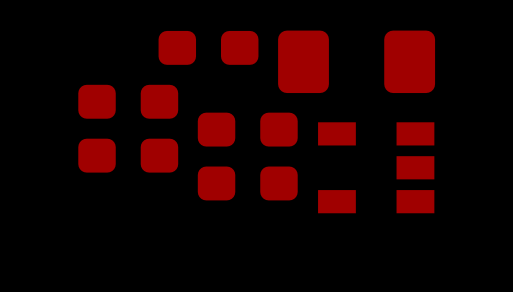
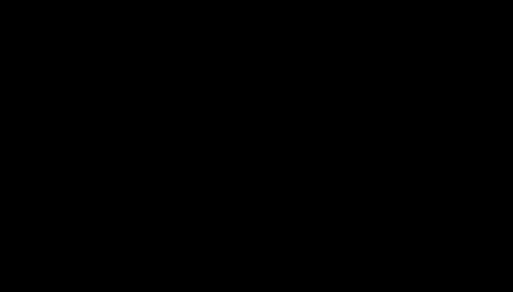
part: (208, 47) -> none
part: (356, 61) -> none
part: (128, 101) -> none
part: (247, 129) -> none
part: (128, 155) -> none
part: (376, 167) -> none
part: (247, 183) -> none

